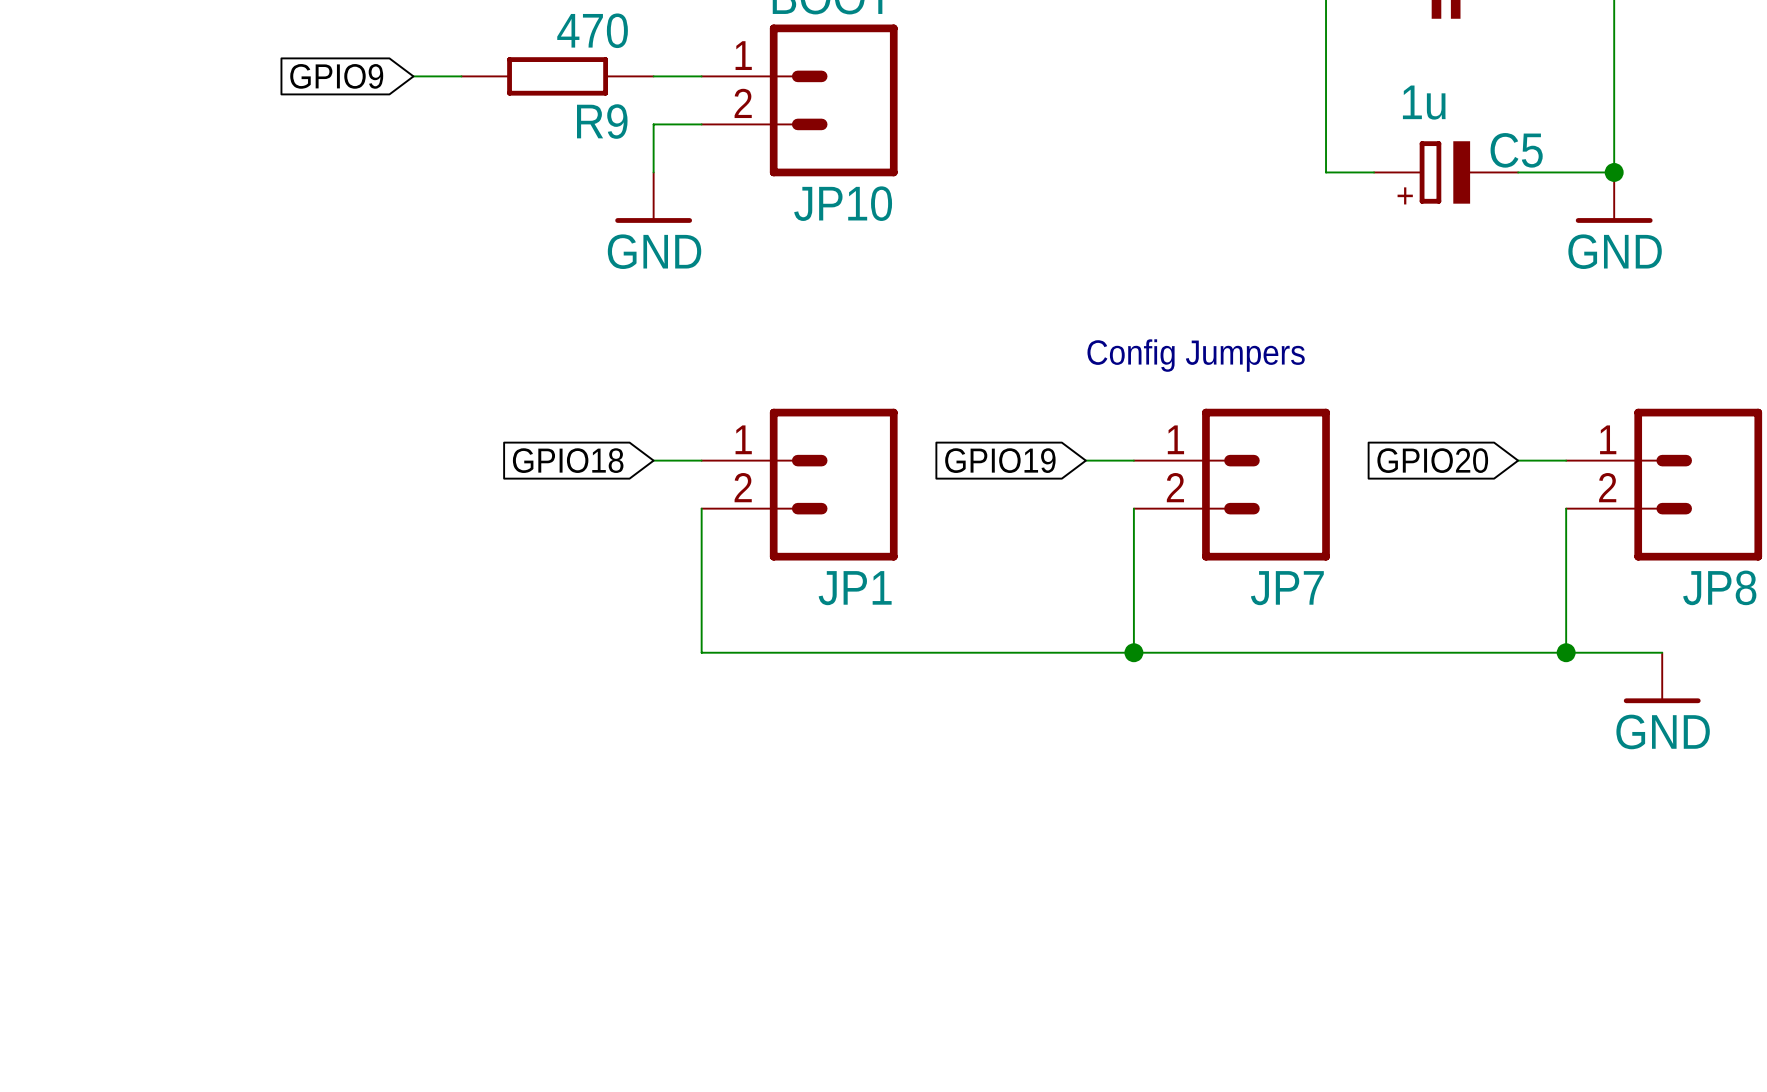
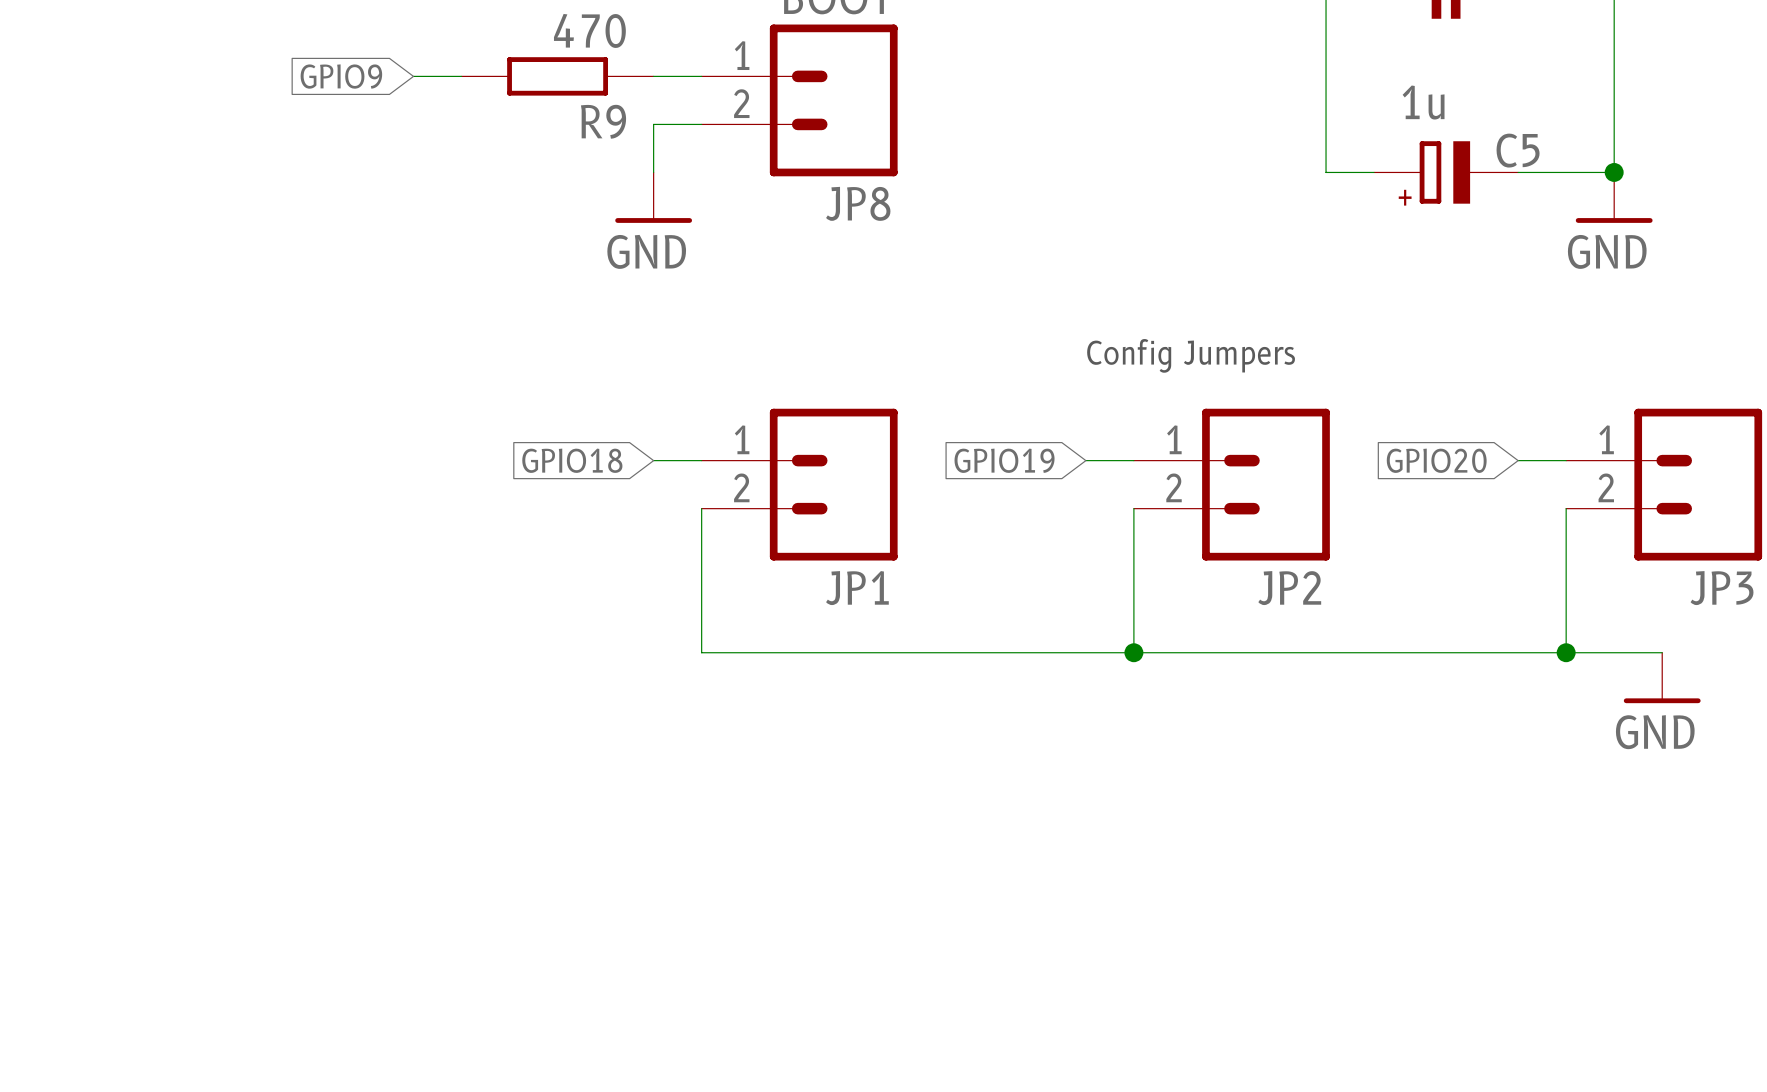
JP10 name: JP10 (843, 203) -> JP8 (858, 203)
JP8 name: JP8 (1719, 587) -> JP3 (1722, 588)
JP7 name: JP7 (1287, 588) -> JP2 (1289, 588)

